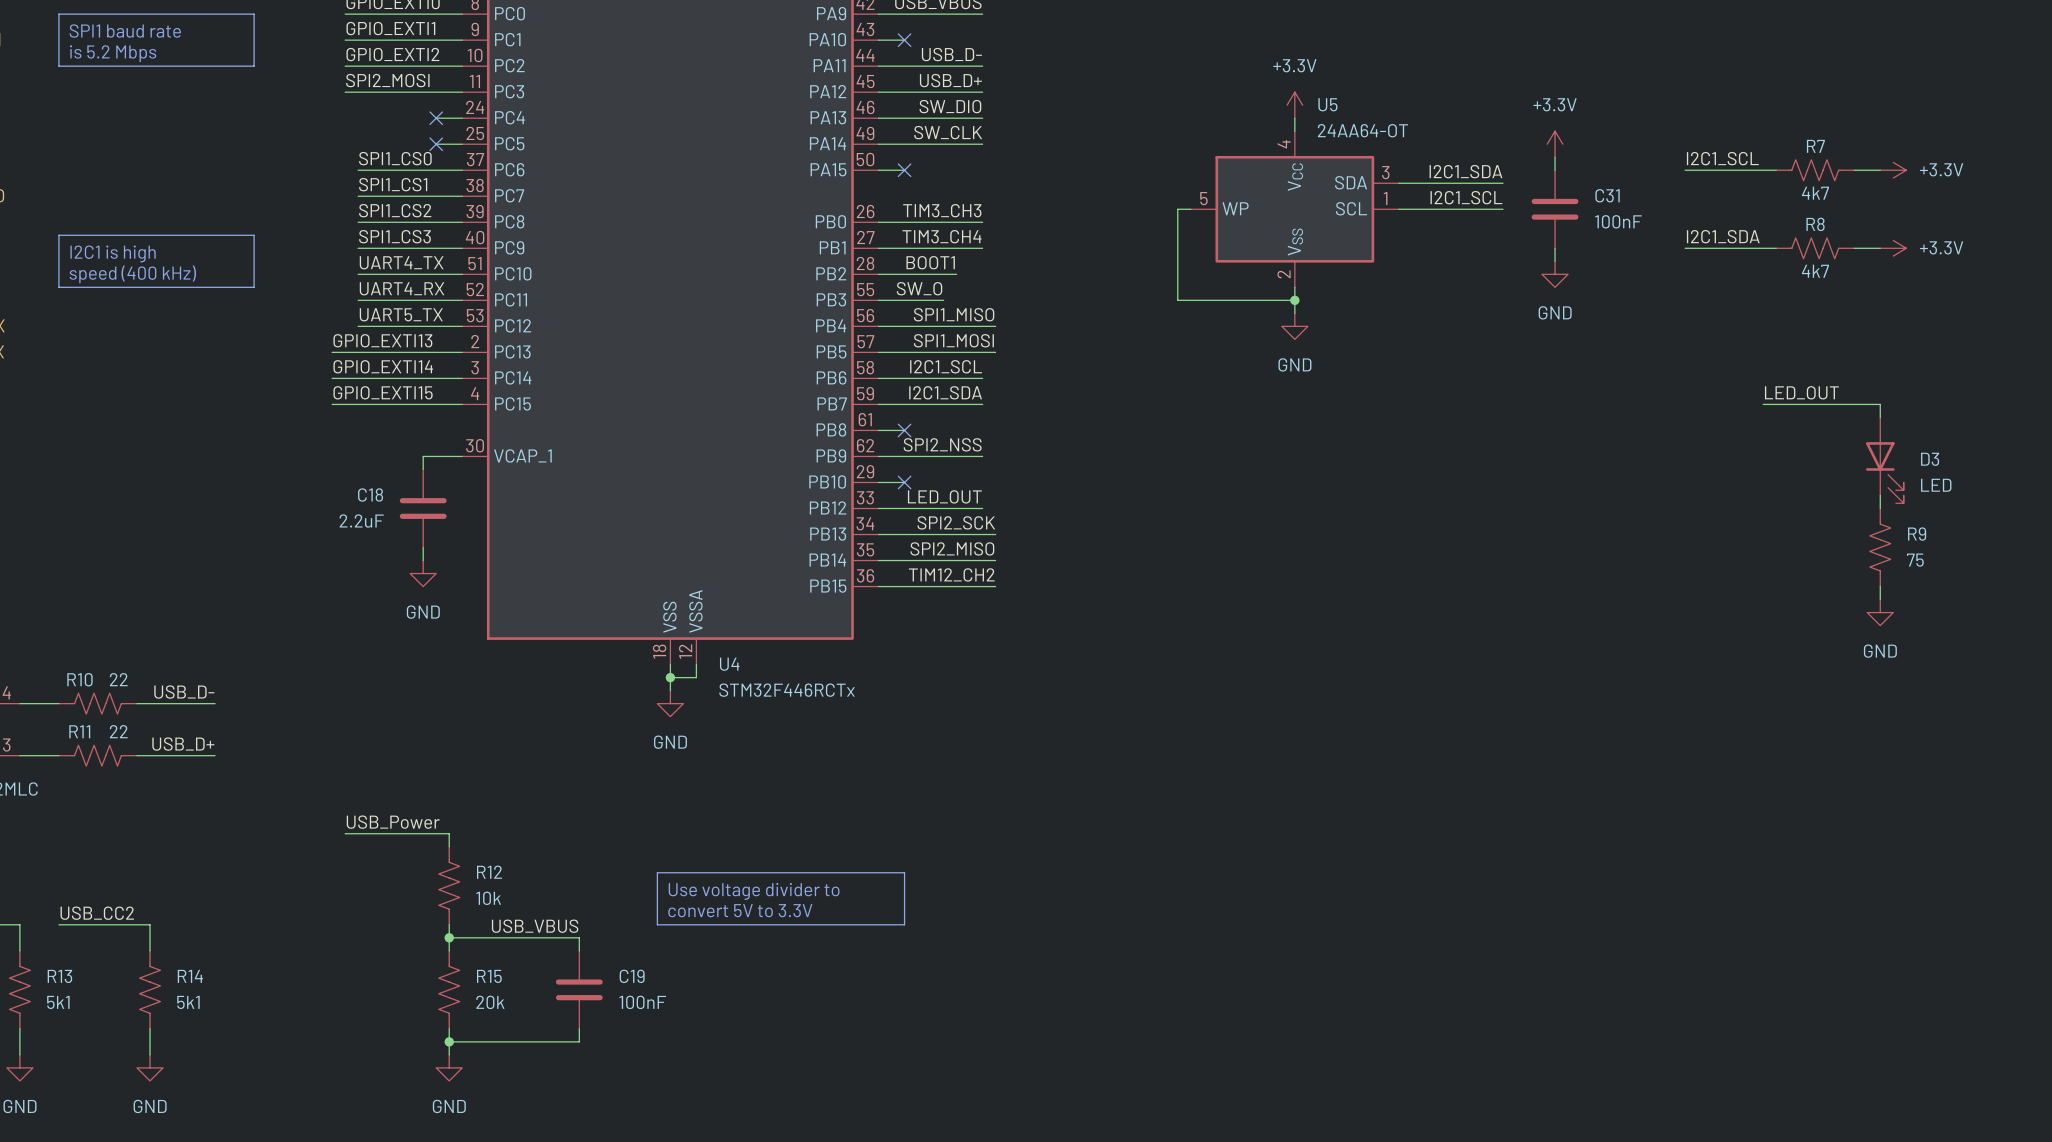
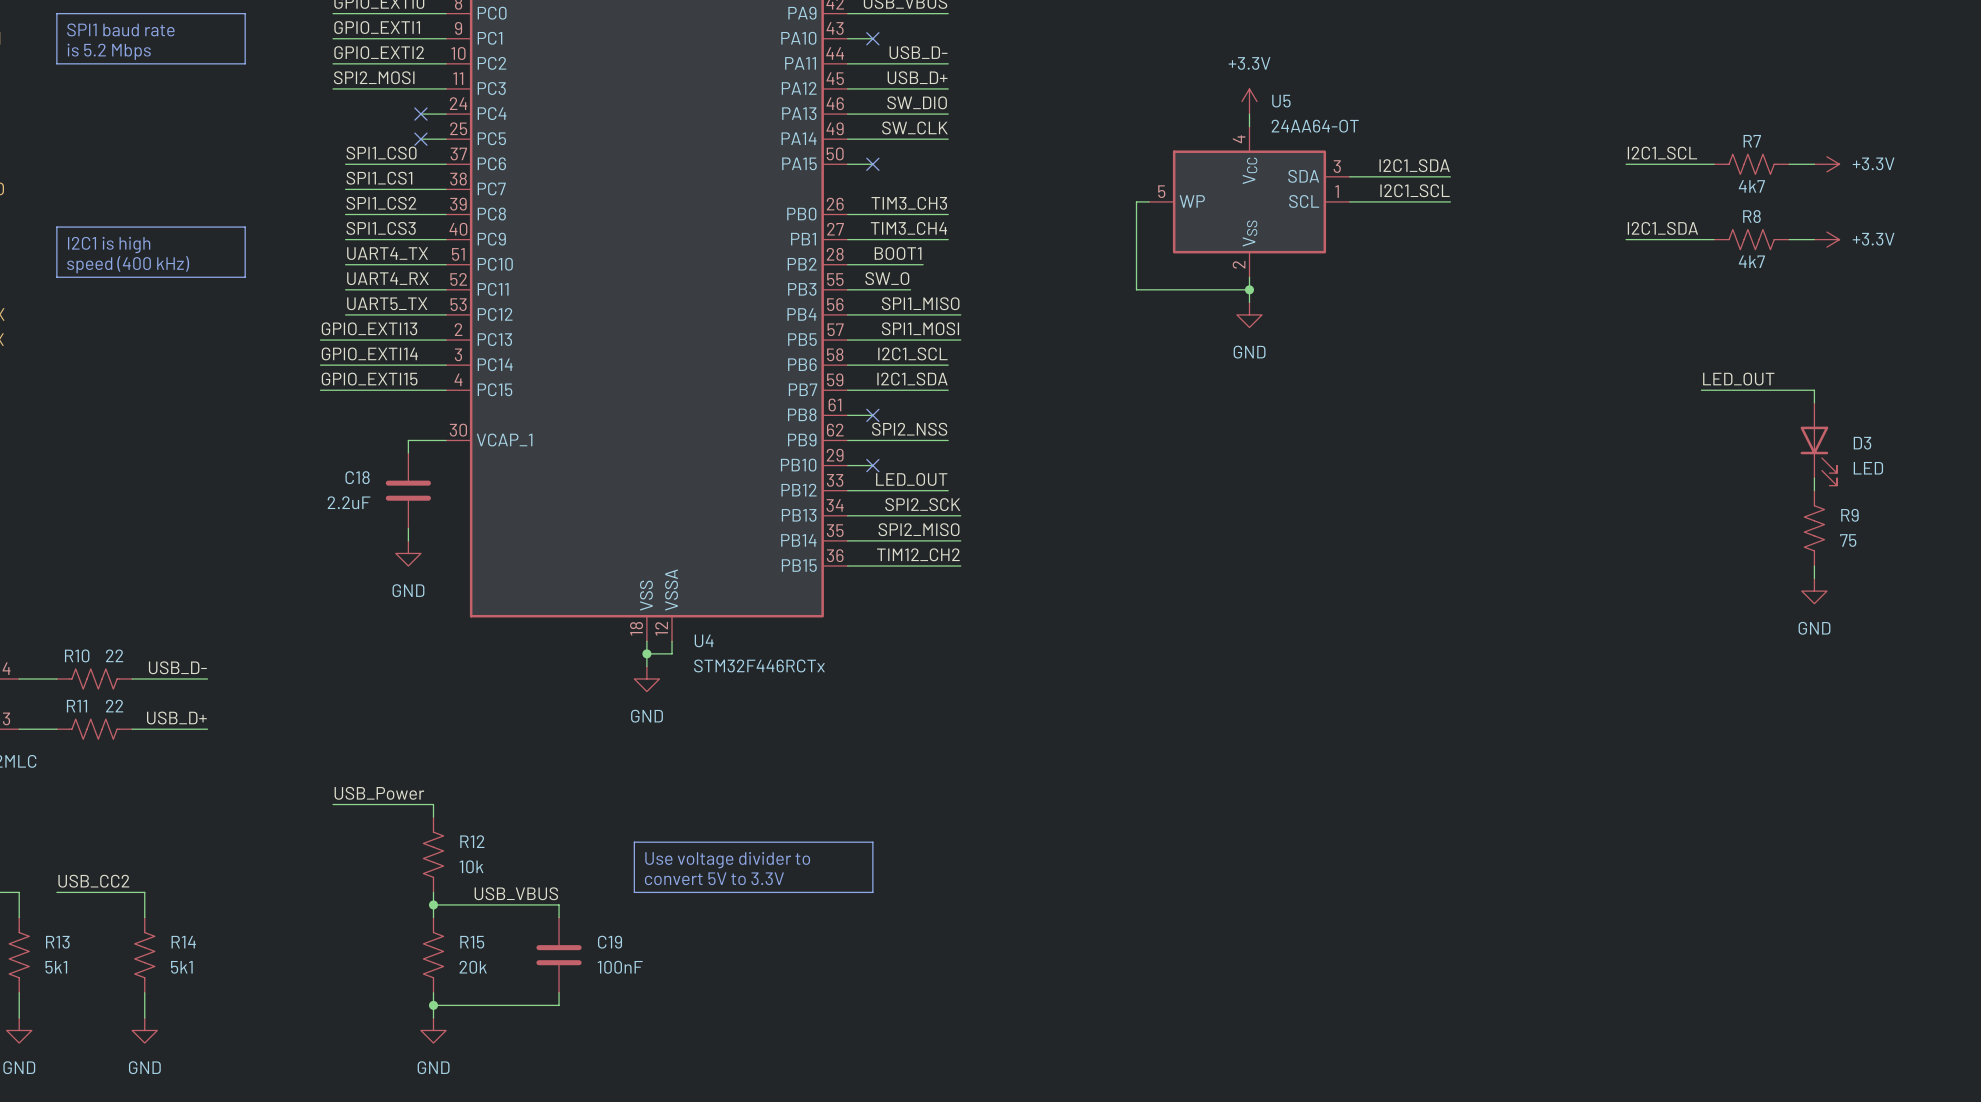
power symbol: +3.3V (1555, 144) -> none
wire: (1555, 157) (1555, 170) -> none
C31: 100nF (1555, 209) -> none
wire: (1555, 248) (1555, 261) -> none
power symbol: GND (1555, 274) -> none

